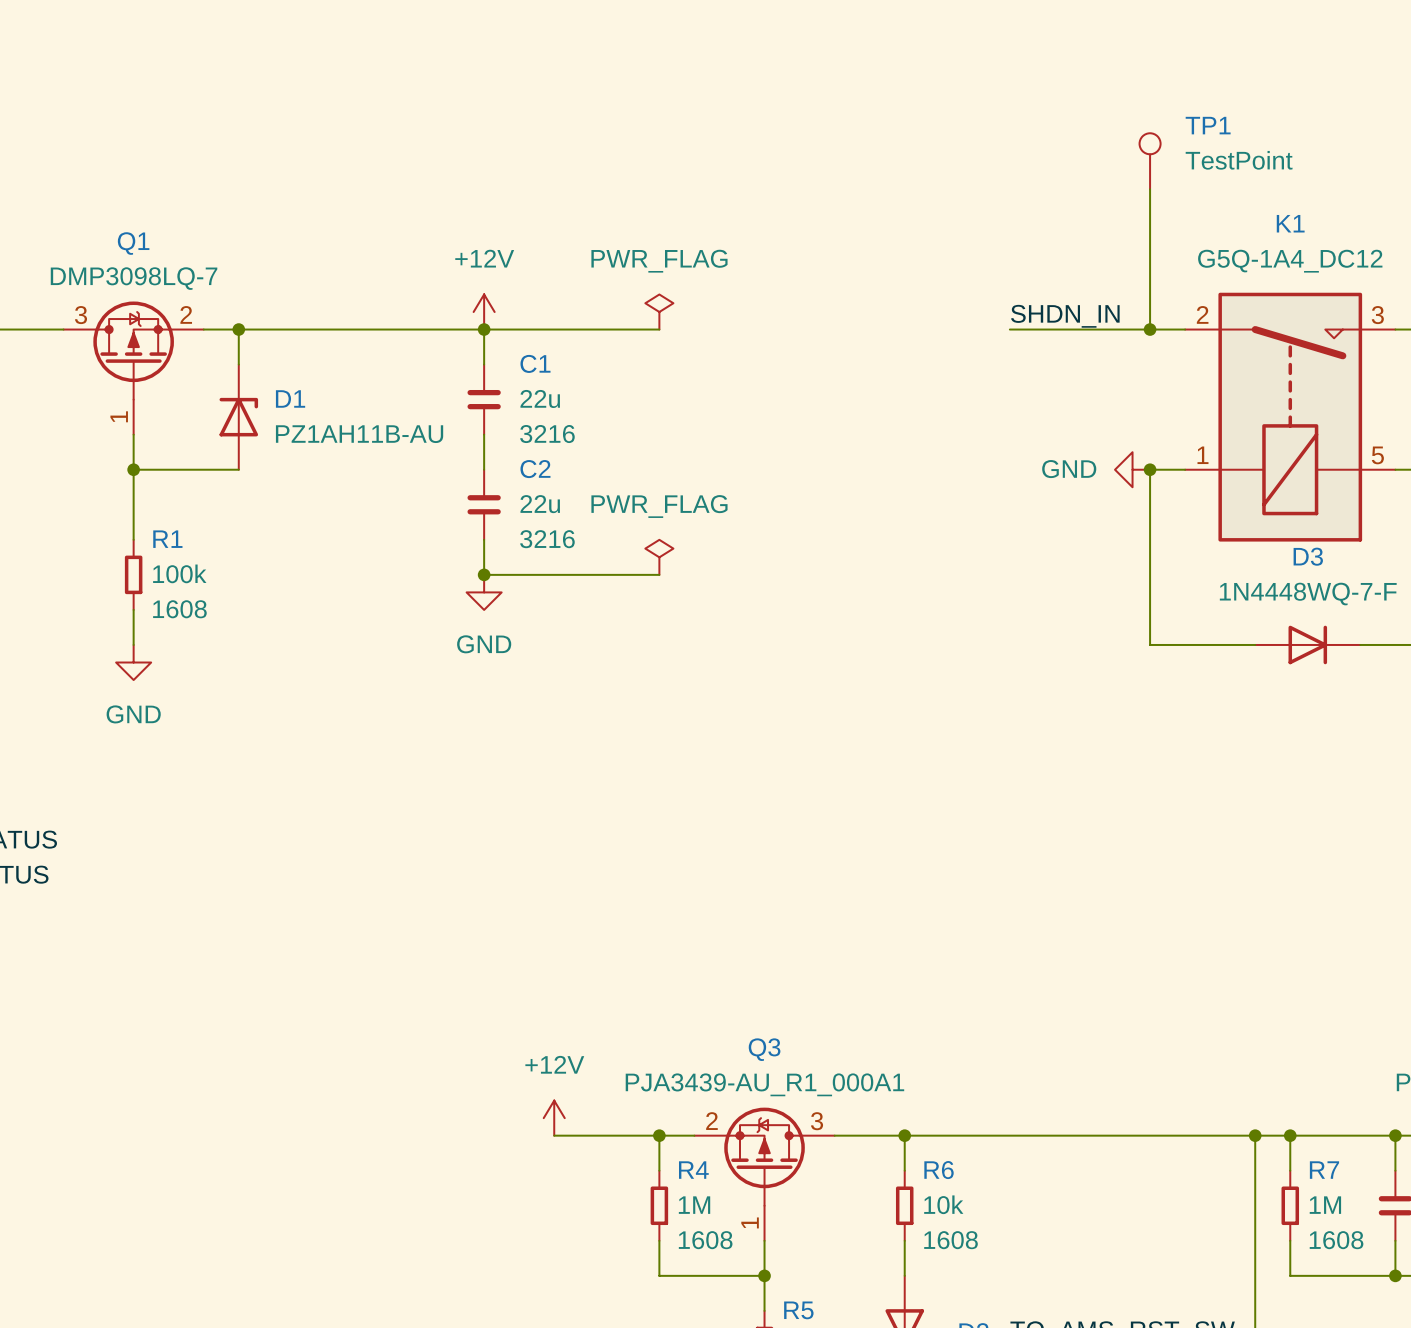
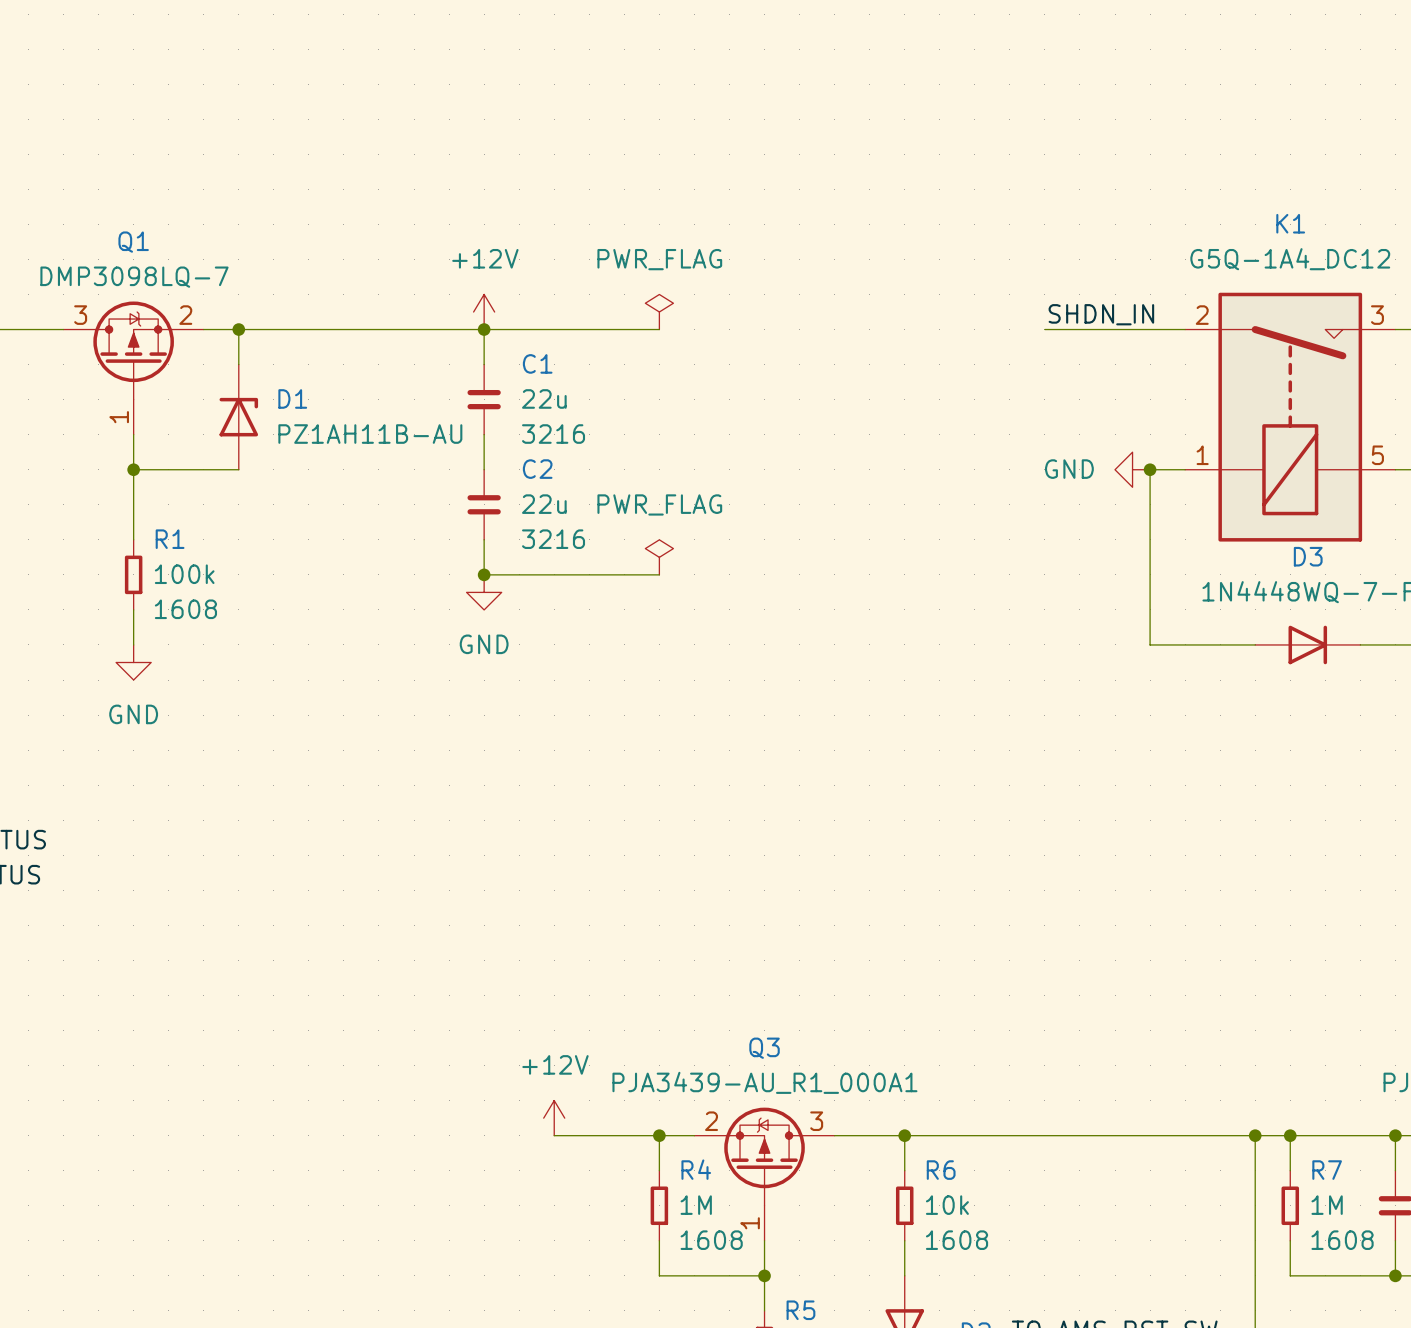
TP1: TestPoint (1150, 161) -> none
wire: (1150, 189) (1150, 329) -> none
label position: SHDN_IN (1065, 316) -> SHDN_IN (1101, 314)
wire: (1009, 329) (1044, 329) -> none
junction: (1150, 329) -> none

